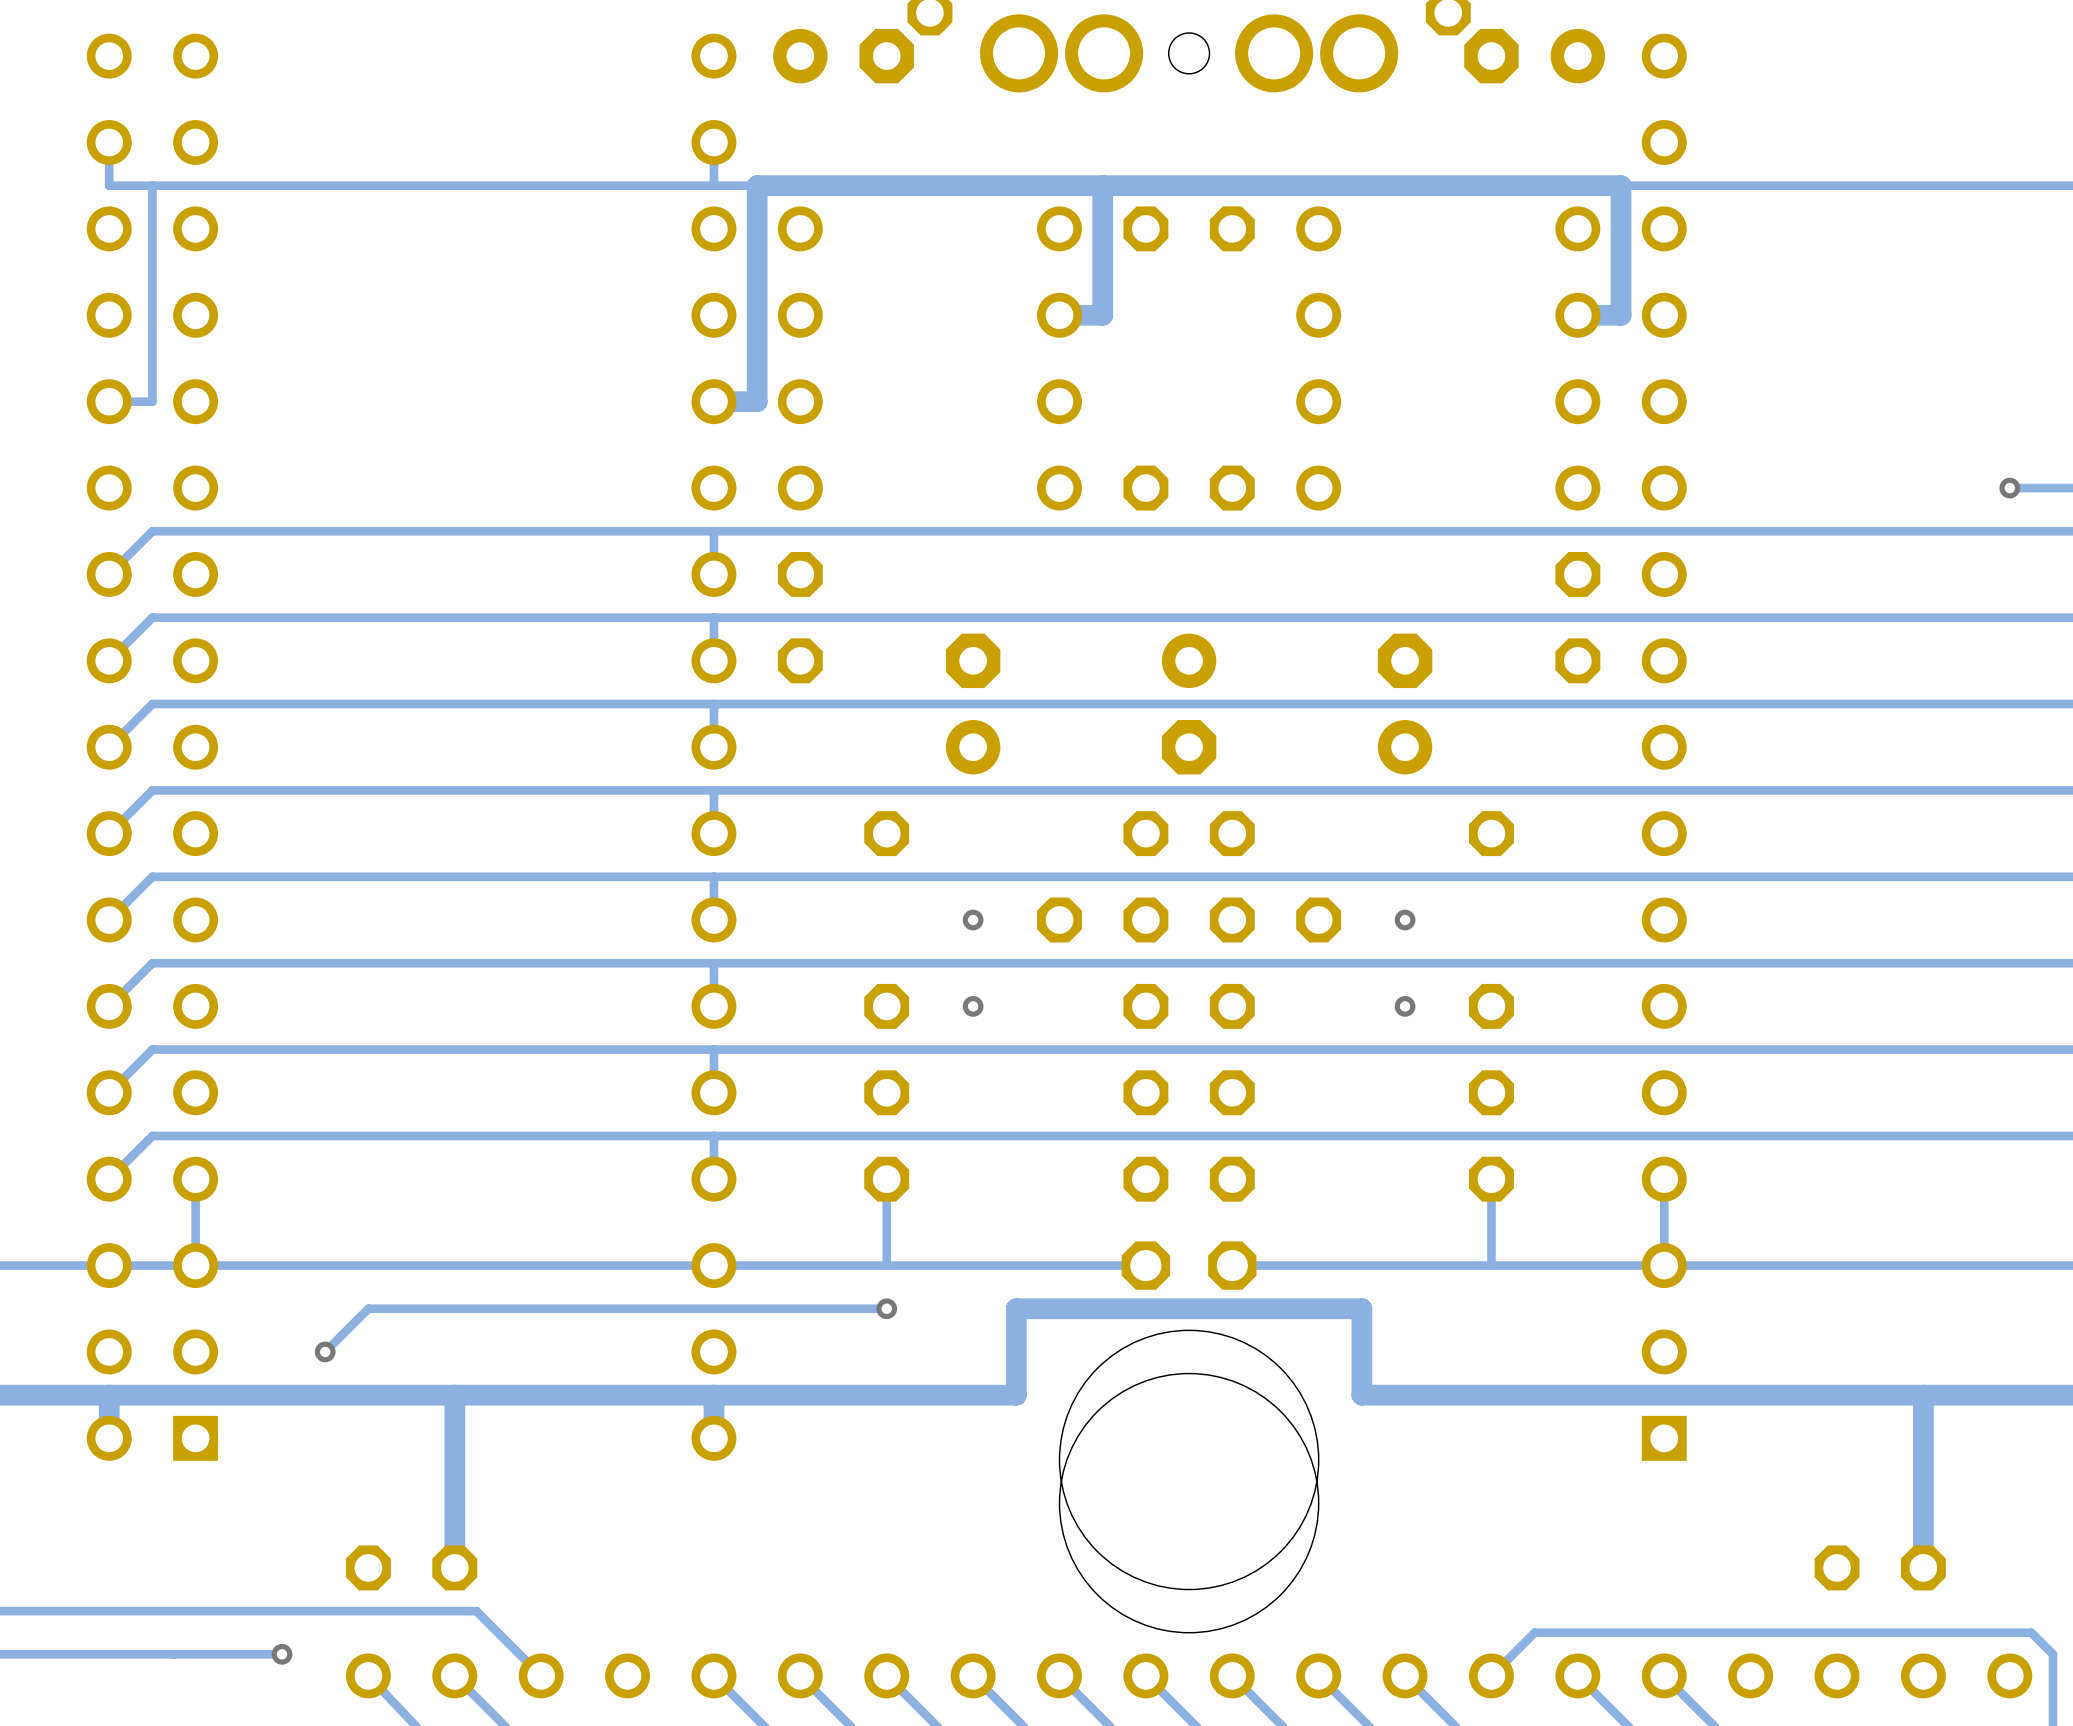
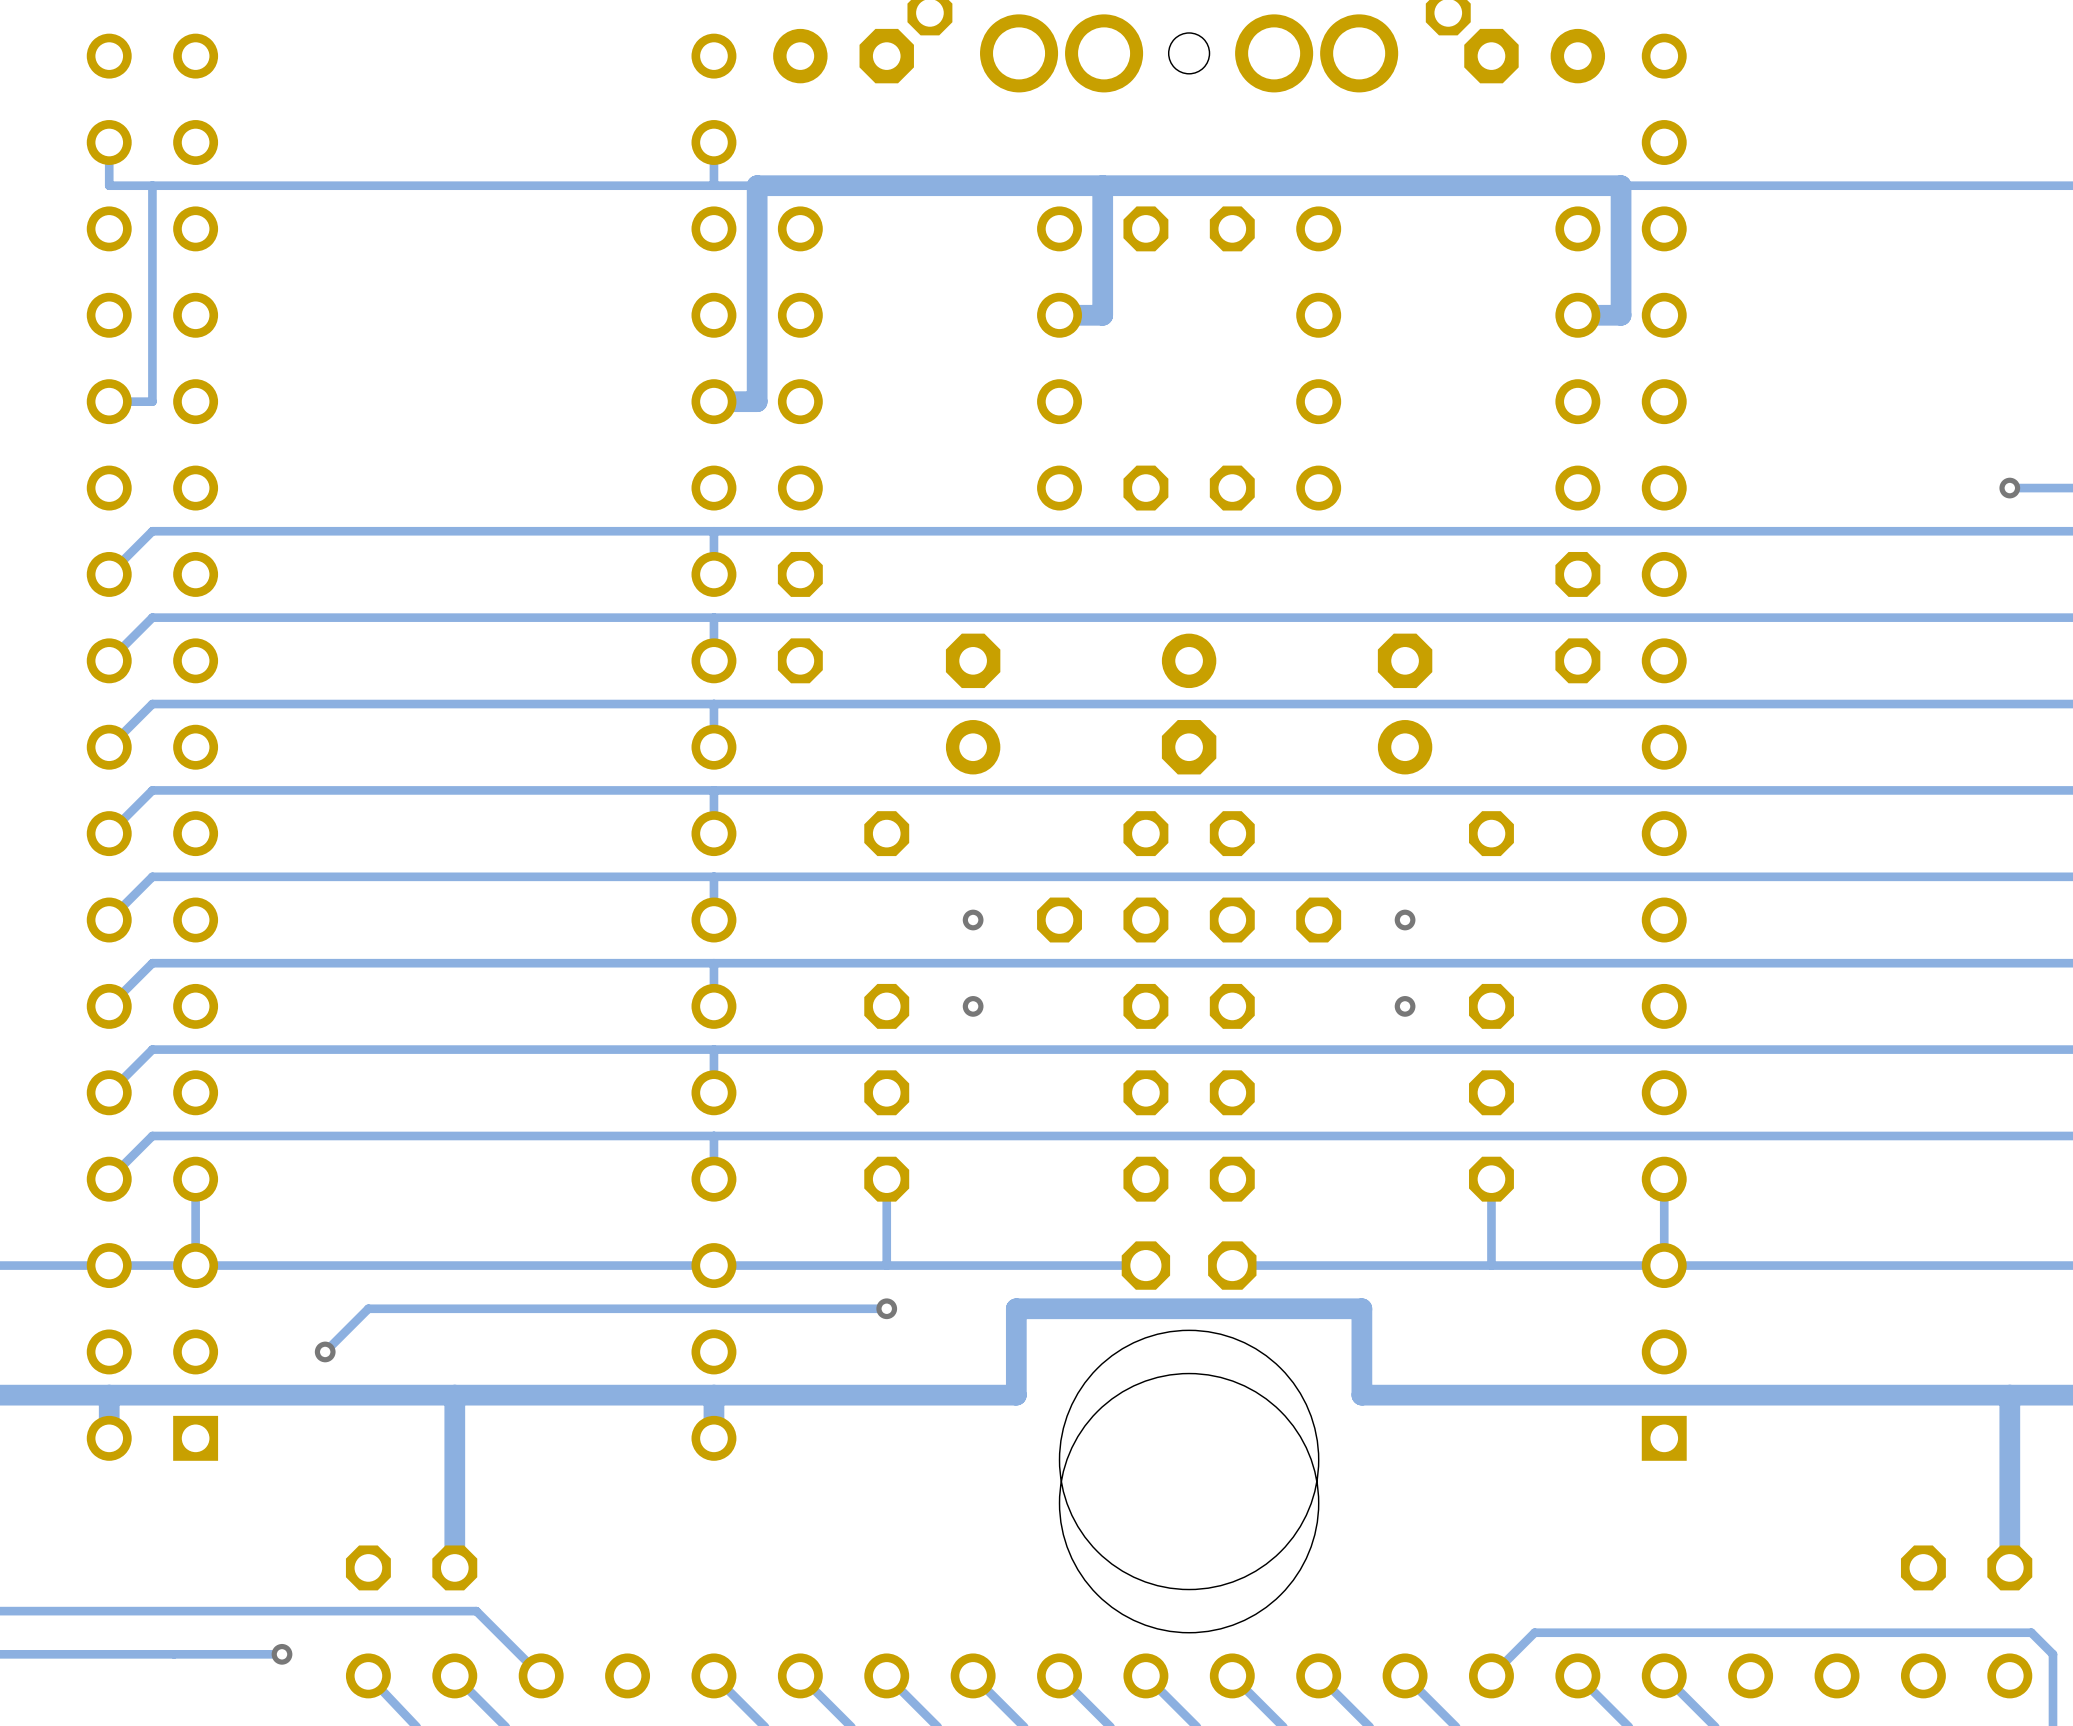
track: (1923, 1395) (1923, 1567) -> (2009, 1395) (2009, 1567)
part position: (1880, 1567) -> (1966, 1567)

